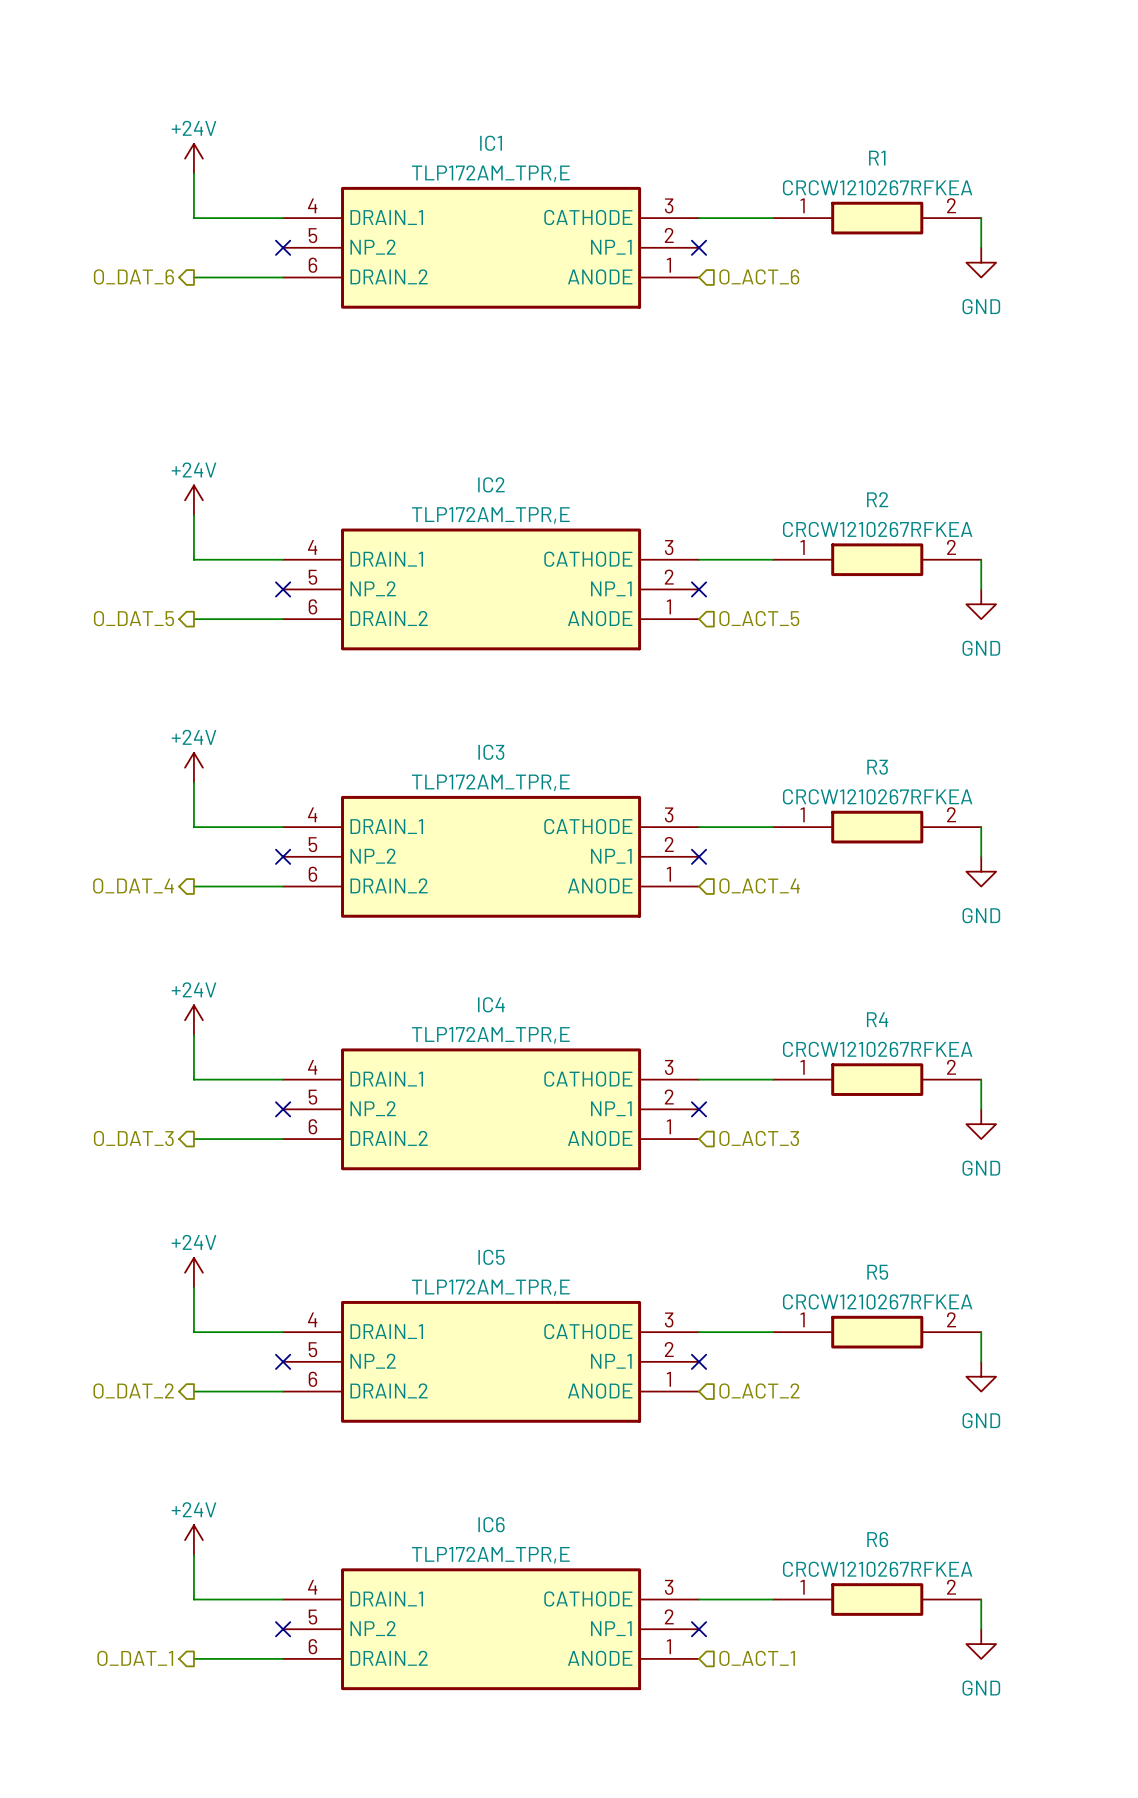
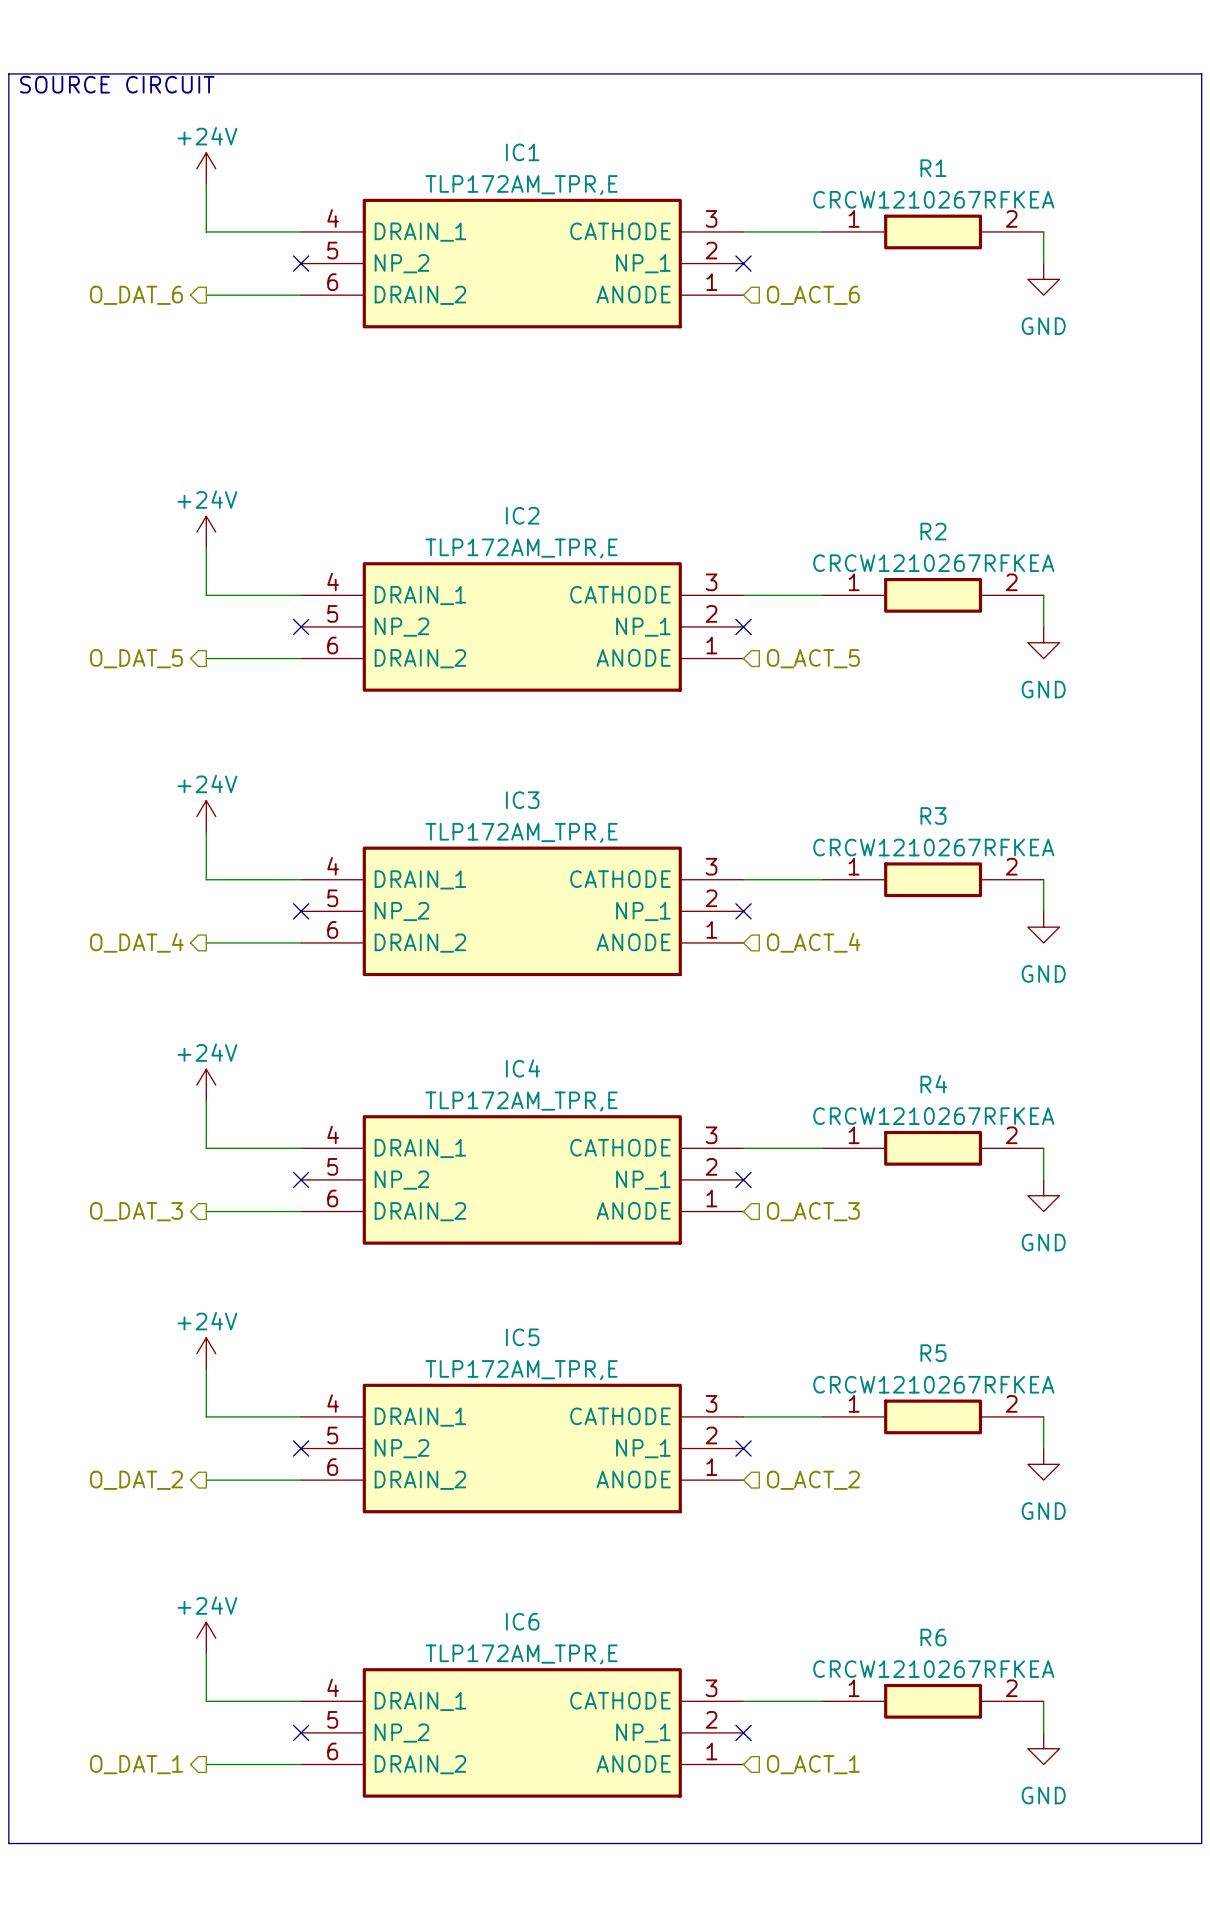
line: none -> (8, 73) (1201, 73) (1201, 1843) (8, 1843) (8, 73)
text: none -> SOURCE CIRCUIT (117, 84)

